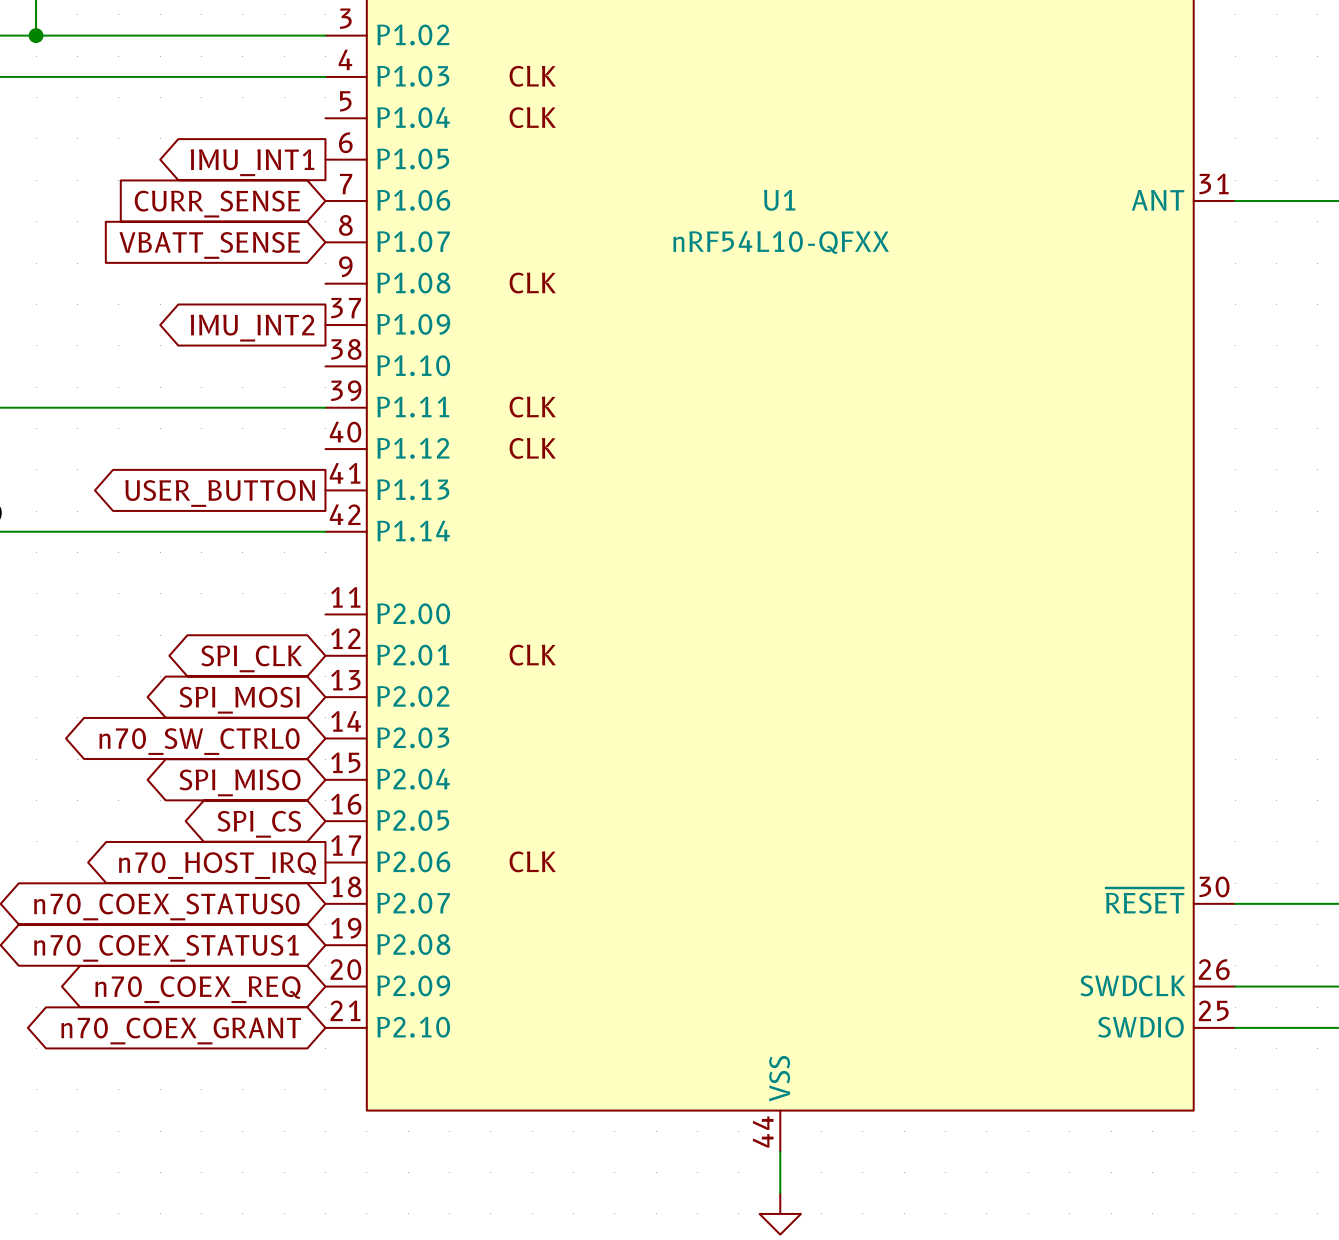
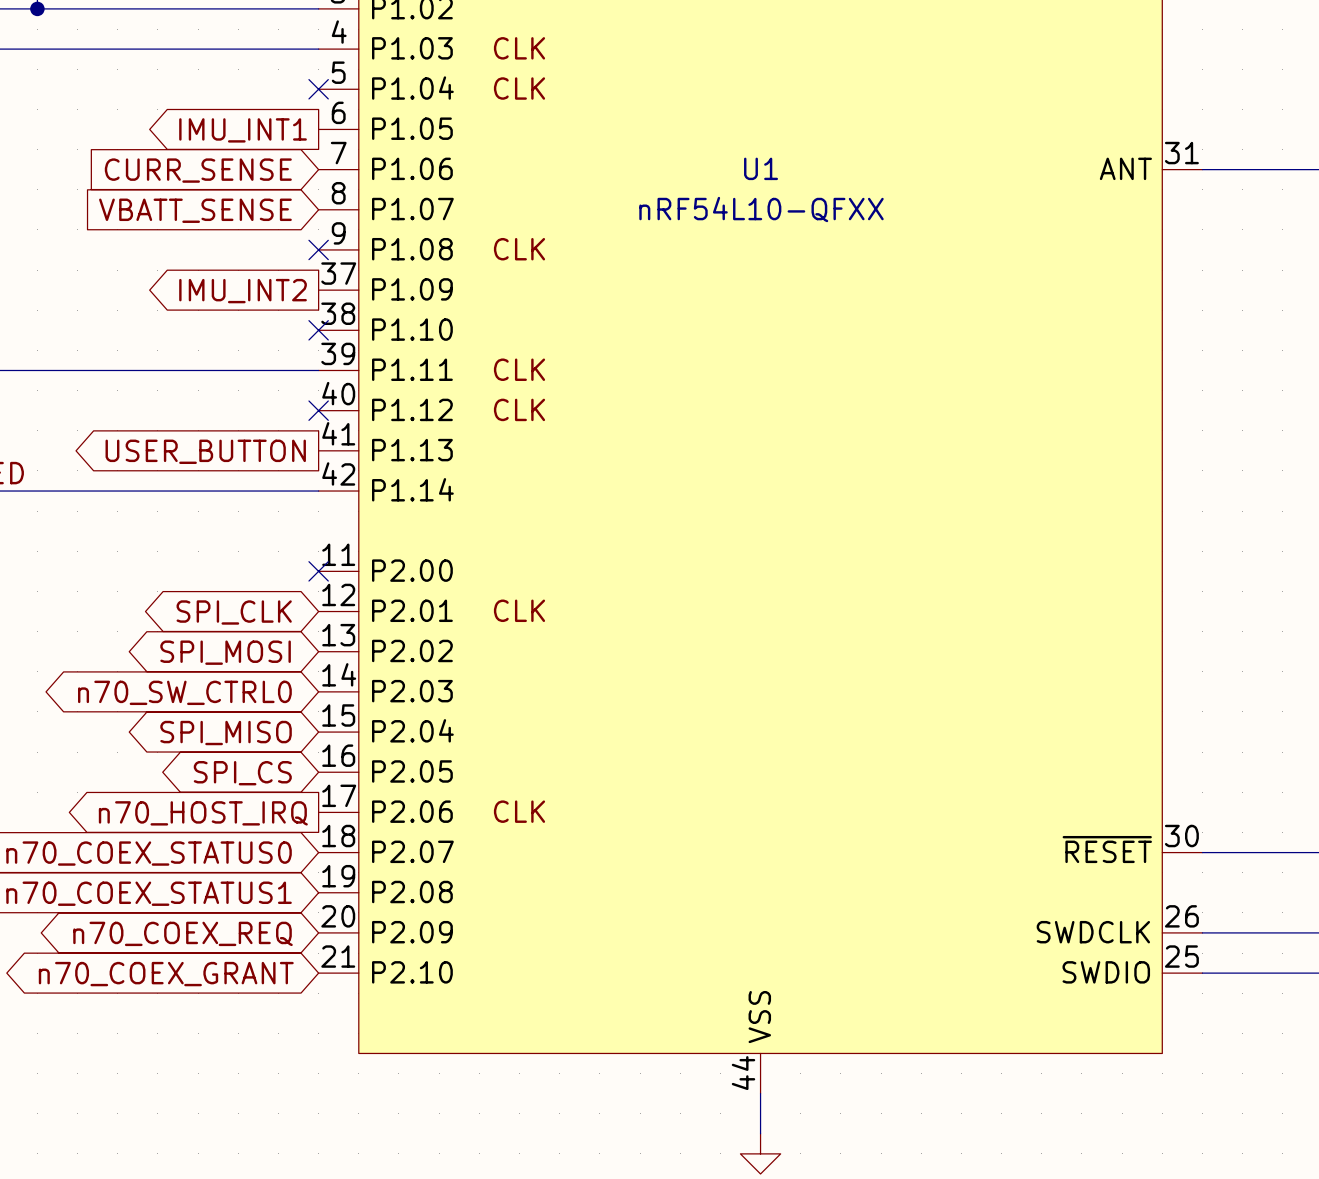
no-connect mark: none -> (318, 89)
no-connect mark: none -> (318, 249)
no-connect mark: none -> (318, 330)
no-connect mark: none -> (318, 410)
no-connect mark: none -> (318, 571)

